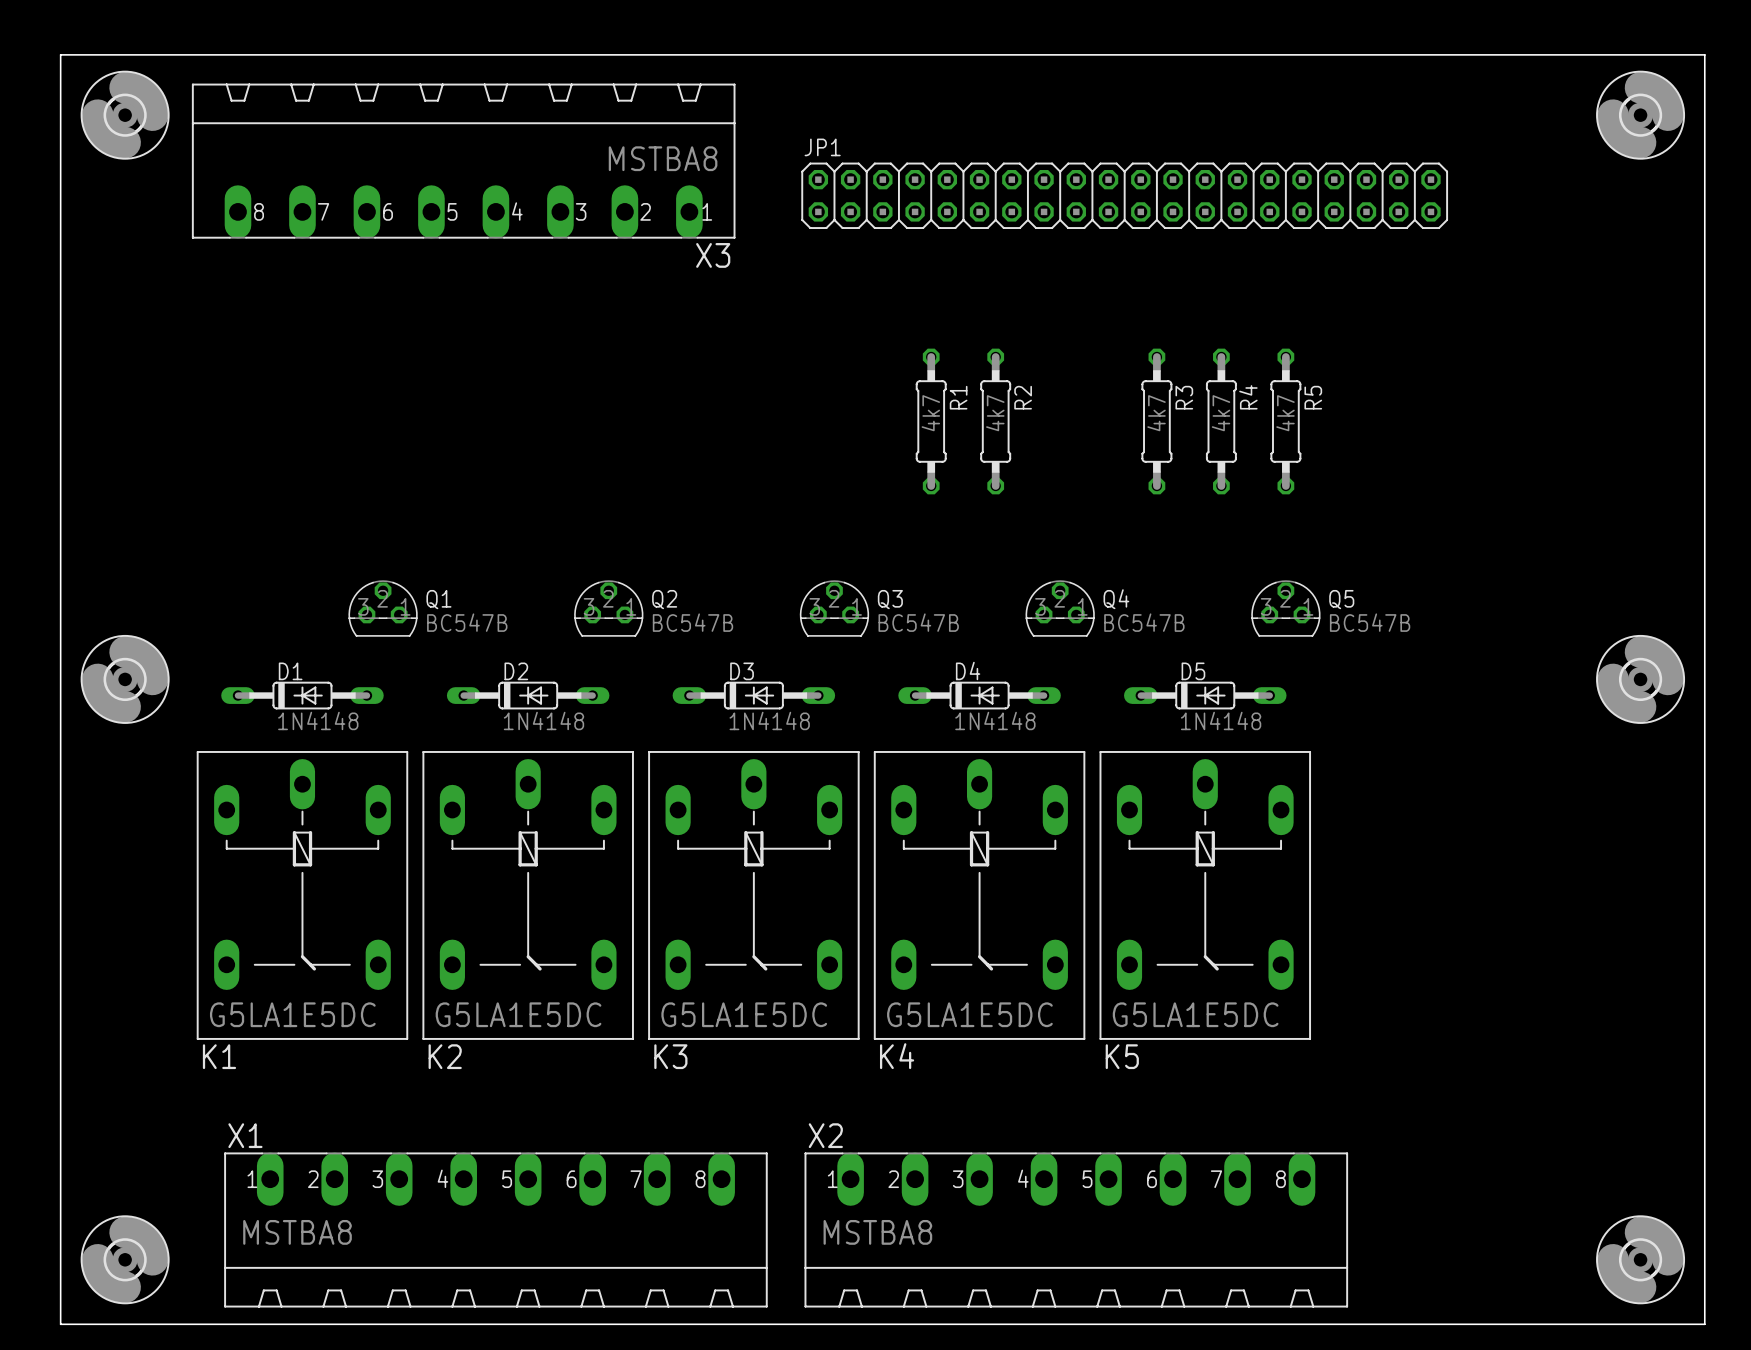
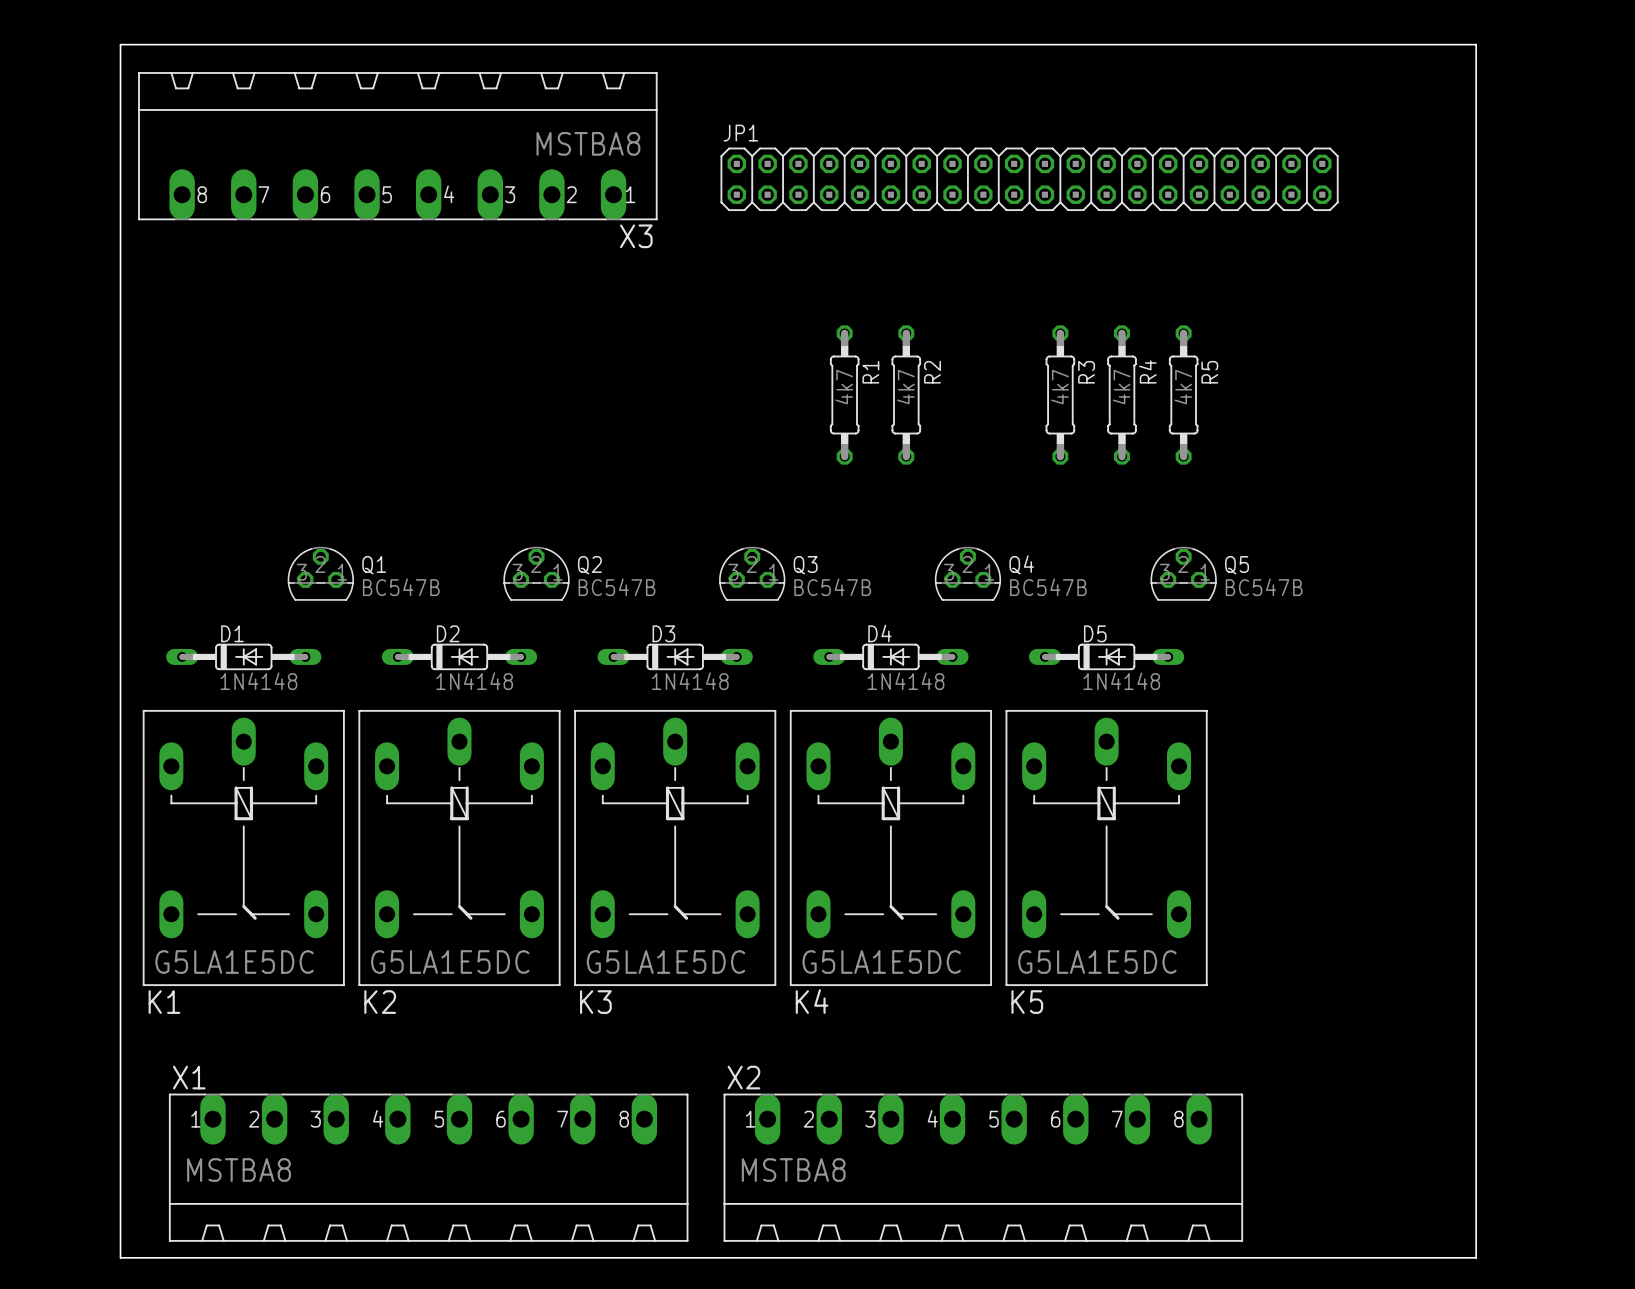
board edge: (173, 54) (60, 54) (60, 1324) (173, 1324) -> (120, 44) (120, 1257)
board edge: (1591, 54) (1704, 54) (1704, 1324) (1591, 1324) -> (1476, 44) (1476, 1257)
part: (125, 115) -> none
part: (1640, 115) -> none
part: (125, 679) -> none
part: (1640, 679) -> none
part: (125, 1259) -> none
part: (1640, 1259) -> none

